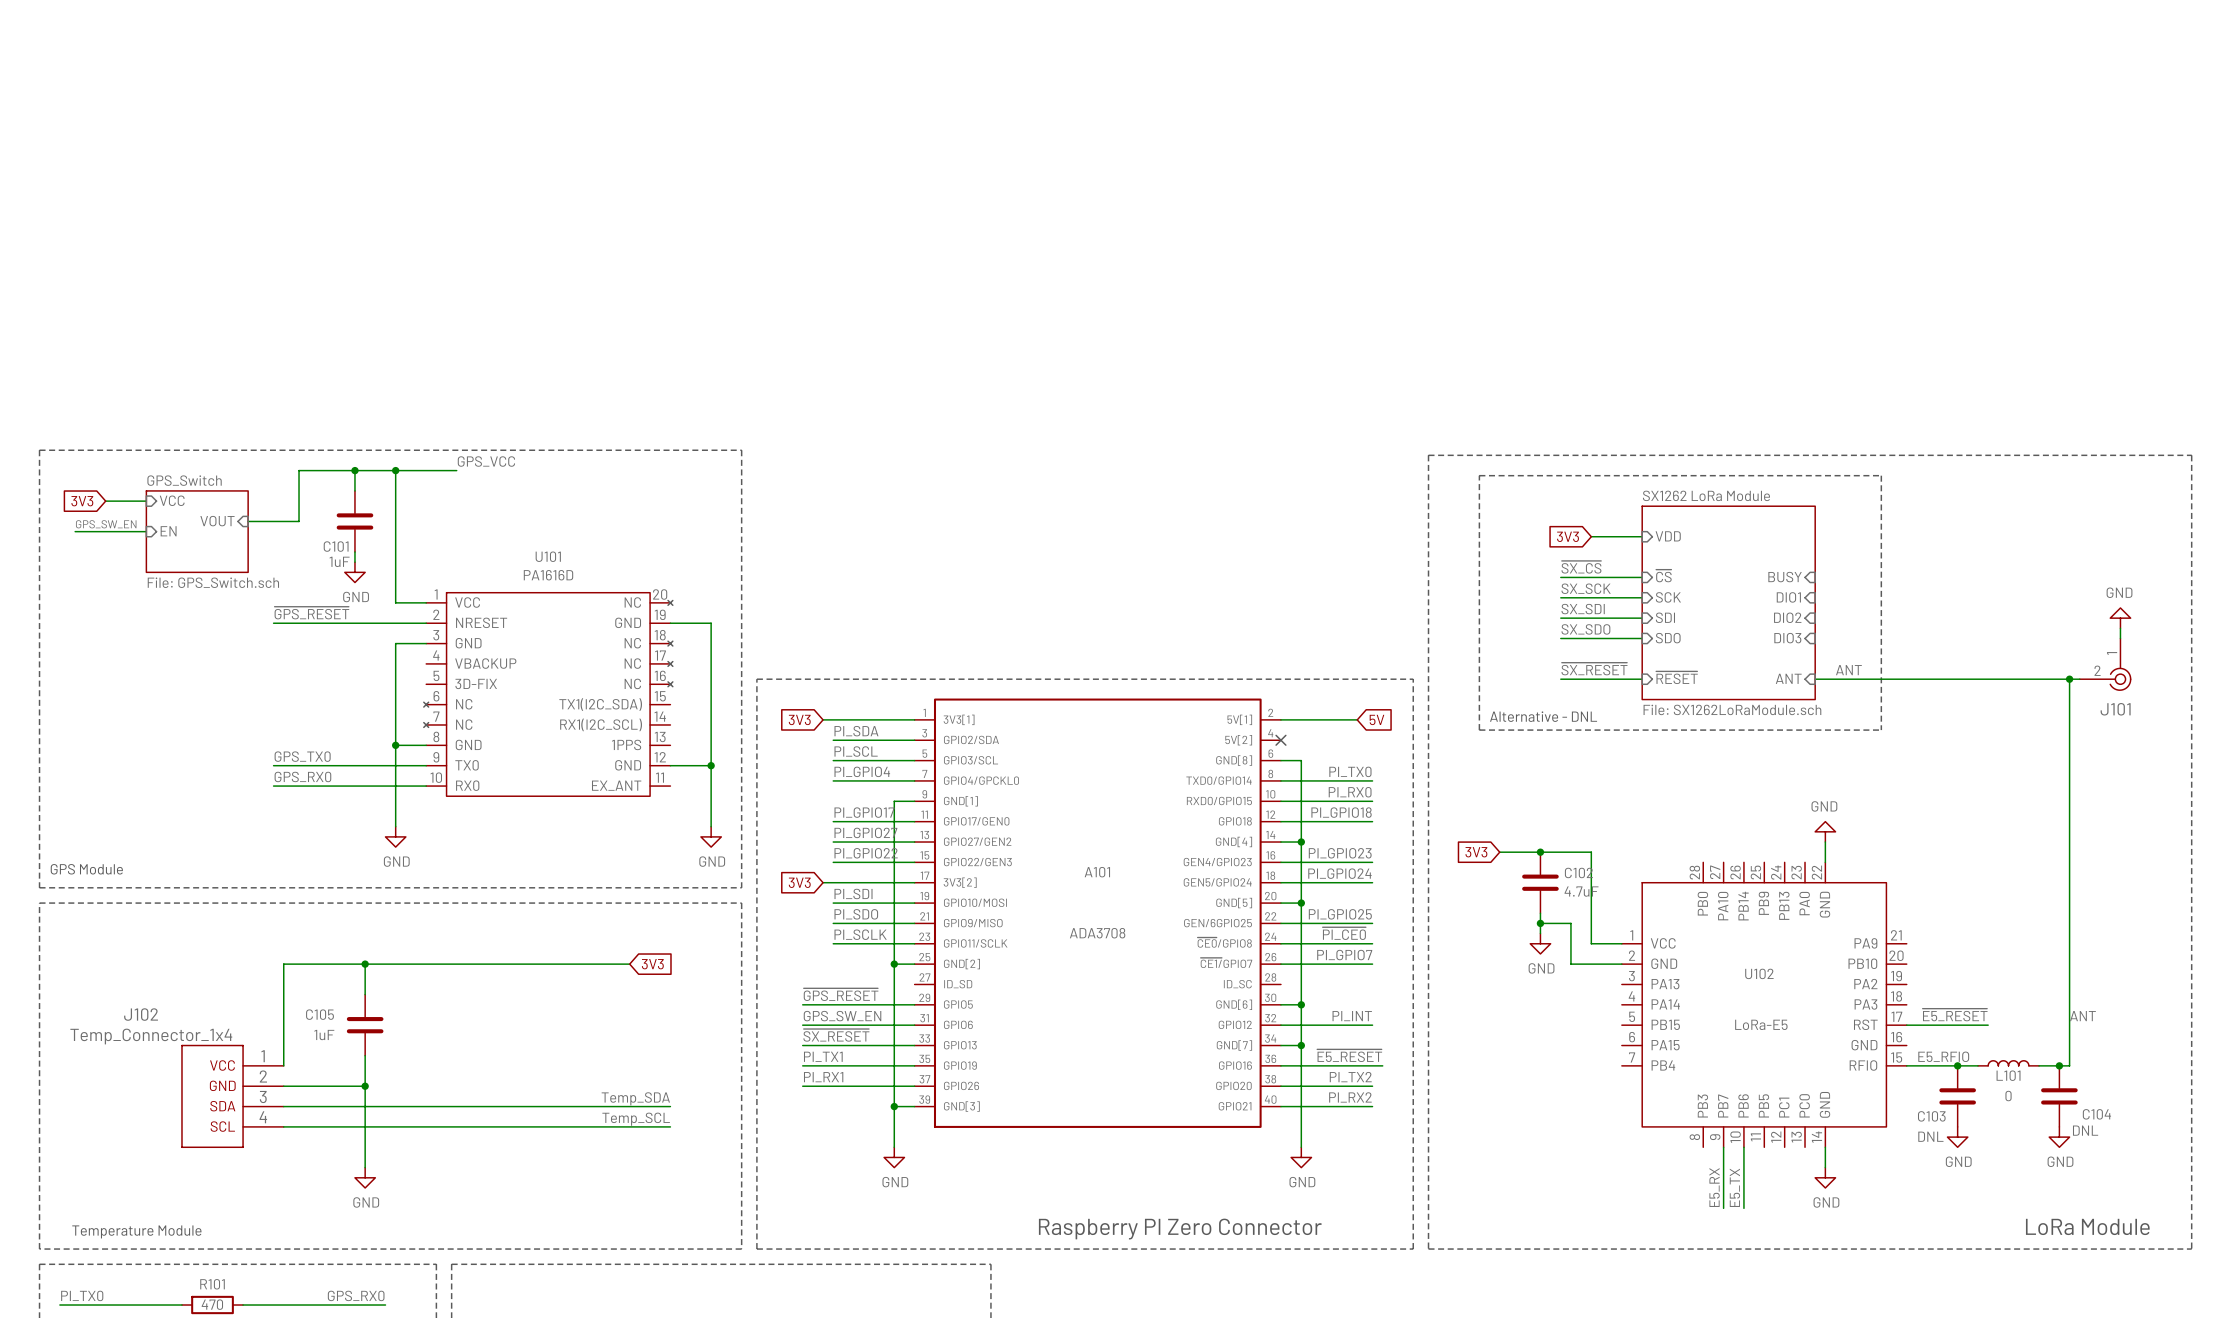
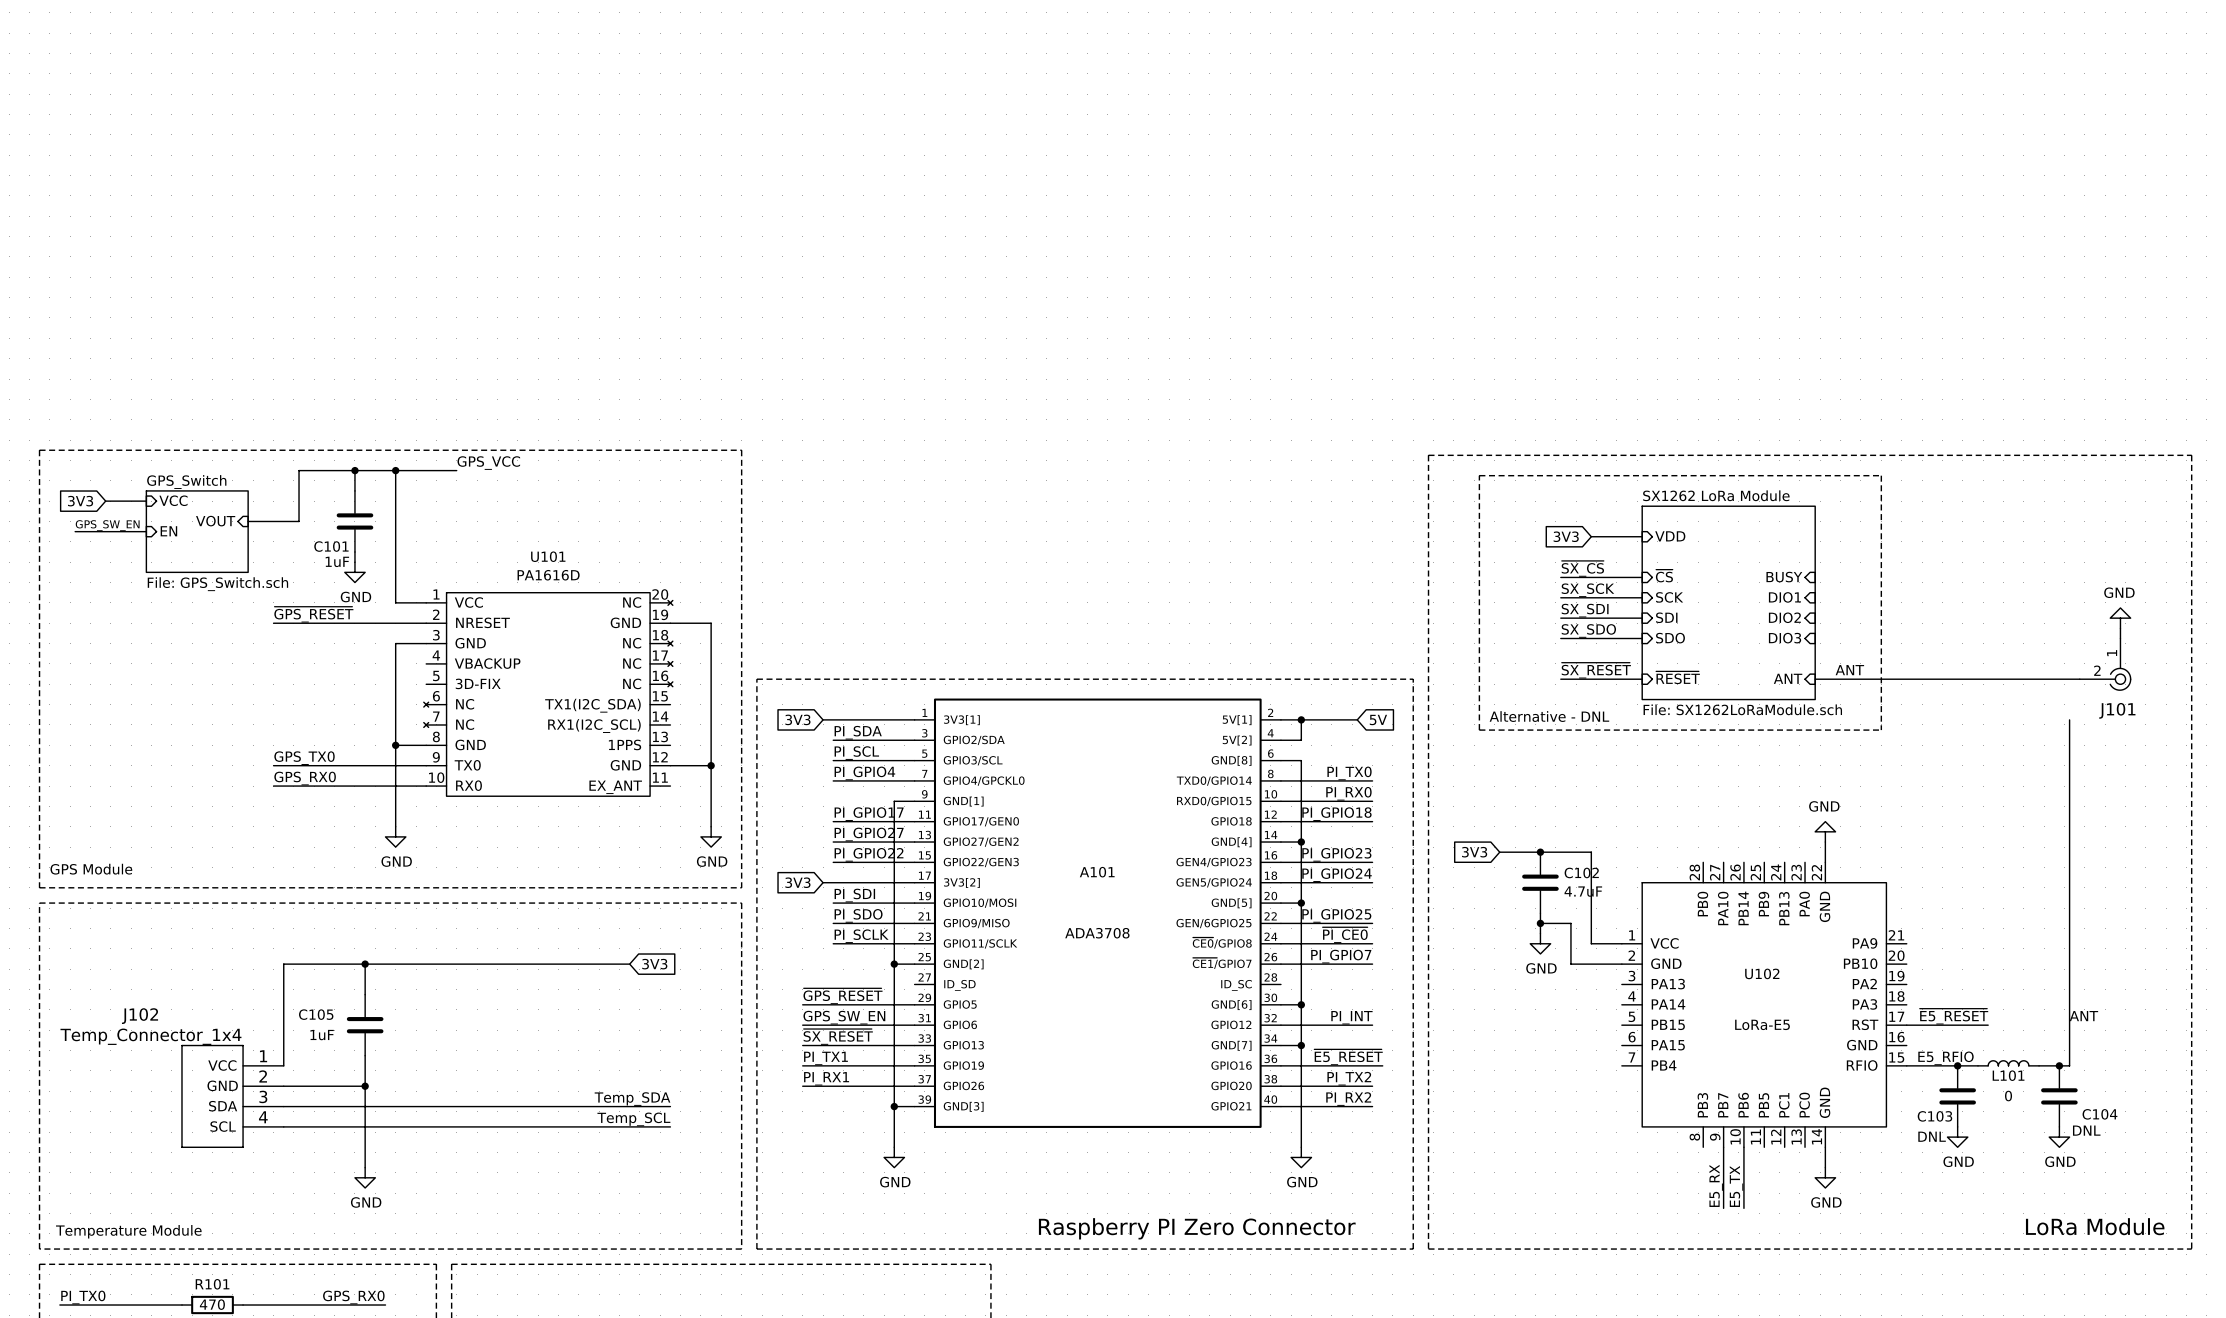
wire: (2069, 679) (2069, 719) -> none
junction: (2069, 679) -> none
wire: none -> (1301, 719) (1301, 740) (1280, 740)
junction: none -> (1301, 719)
no-connect mark: (1280, 740) -> none

